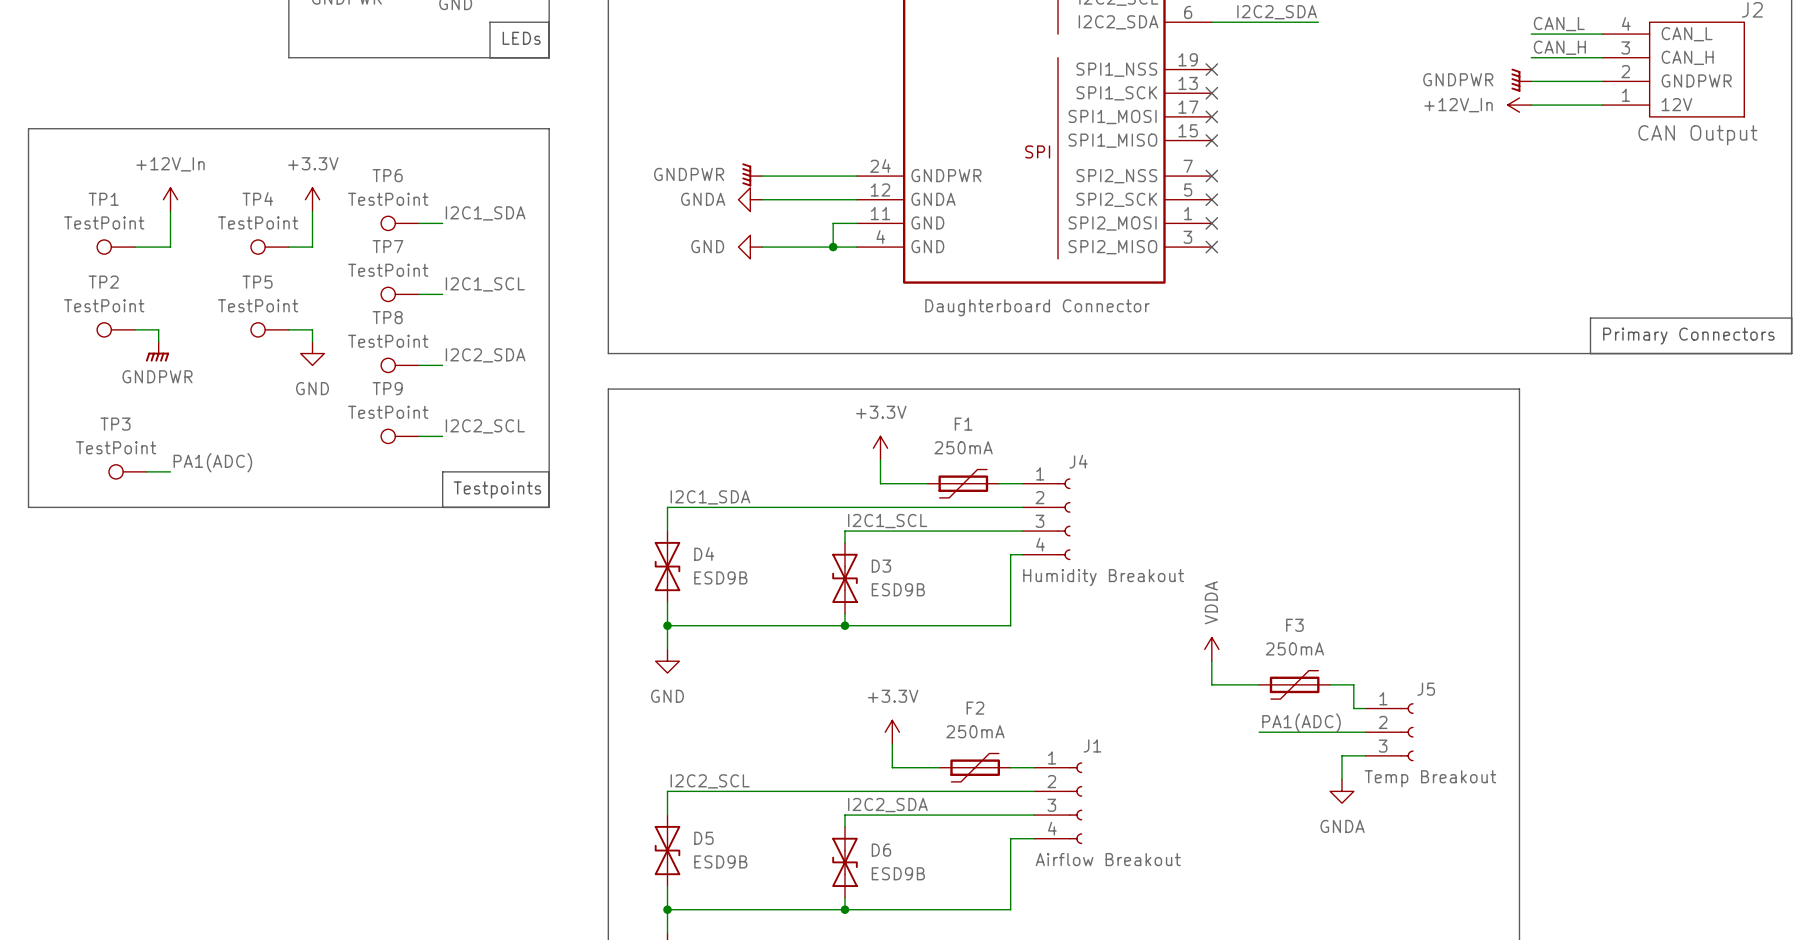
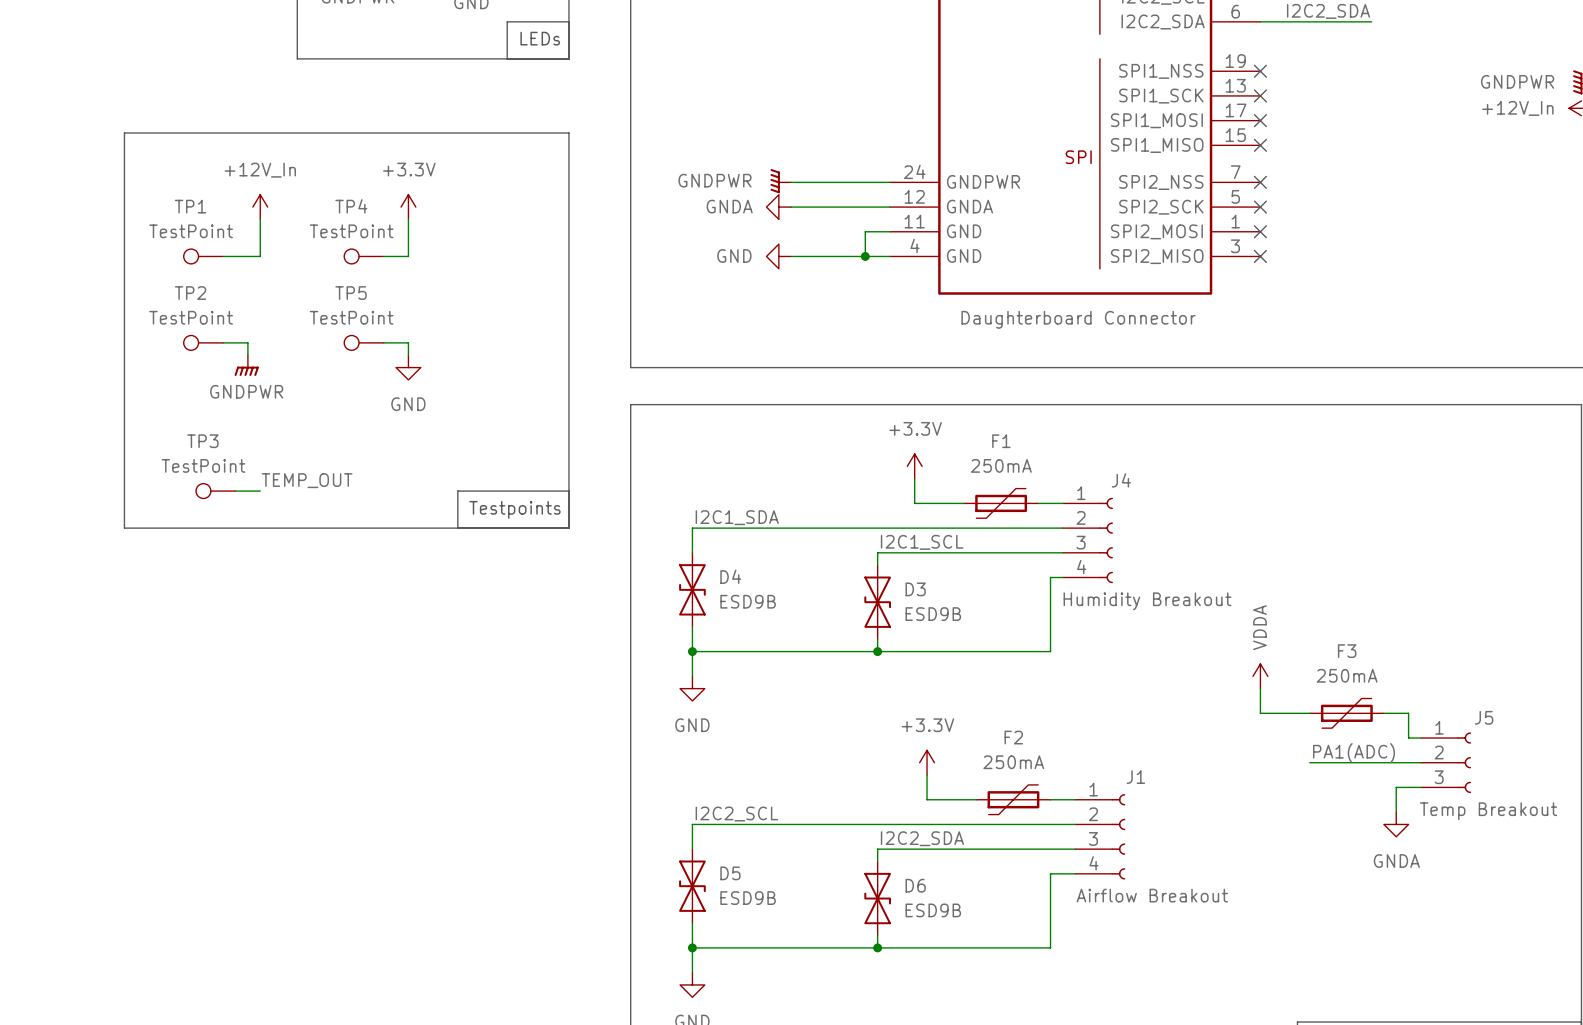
line: (123, 128) (28, 128) (28, 507) (123, 507) -> (124, 132) (124, 528)
power symbol position: +12V_In (170, 199) -> +12V_In (260, 207)
power symbol position: +3.3V (312, 199) -> +3.3V (408, 207)
wire: (170, 211) (170, 247) (135, 247) -> (260, 219) (260, 256) (223, 256)
wire: (312, 211) (312, 247) (288, 247) -> (408, 219) (408, 256) (383, 256)
label: I2C1_SDA (485, 213) -> none
TP6: TestPoint (400, 223) -> none
wire: (419, 223) (442, 223) -> none
TP1 position: (116, 247) -> (203, 256)
TP4 position: (269, 247) -> (363, 256)
label: I2C1_SCL (485, 284) -> none
TP7: TestPoint (400, 294) -> none
wire: (419, 294) (442, 294) -> none
TP2 position: (116, 329) -> (203, 342)
wire: (135, 329) (158, 329) (158, 341) -> (223, 342) (247, 342) (247, 355)
TP5 position: (269, 329) -> (363, 342)
wire: (288, 329) (312, 329) (312, 341) -> (383, 342) (408, 342) (408, 355)
power symbol position: GNDPWR (157, 351) -> GNDPWR (246, 365)
power symbol position: GND (312, 353) -> GND (408, 367)
label: I2C2_SDA (485, 355) -> none
TP8: TestPoint (400, 365) -> none
wire: (419, 365) (442, 365) -> none
label: I2C2_SCL (485, 426) -> none
TP9: TestPoint (400, 436) -> none
wire: (419, 436) (442, 436) -> none
label: none -> TEMP_OUT (307, 480)
label: PA1(ADC) (212, 462) -> none
TP3 position: (127, 471) -> (215, 491)
wire: (146, 471) (170, 471) -> (235, 491) (260, 491)

